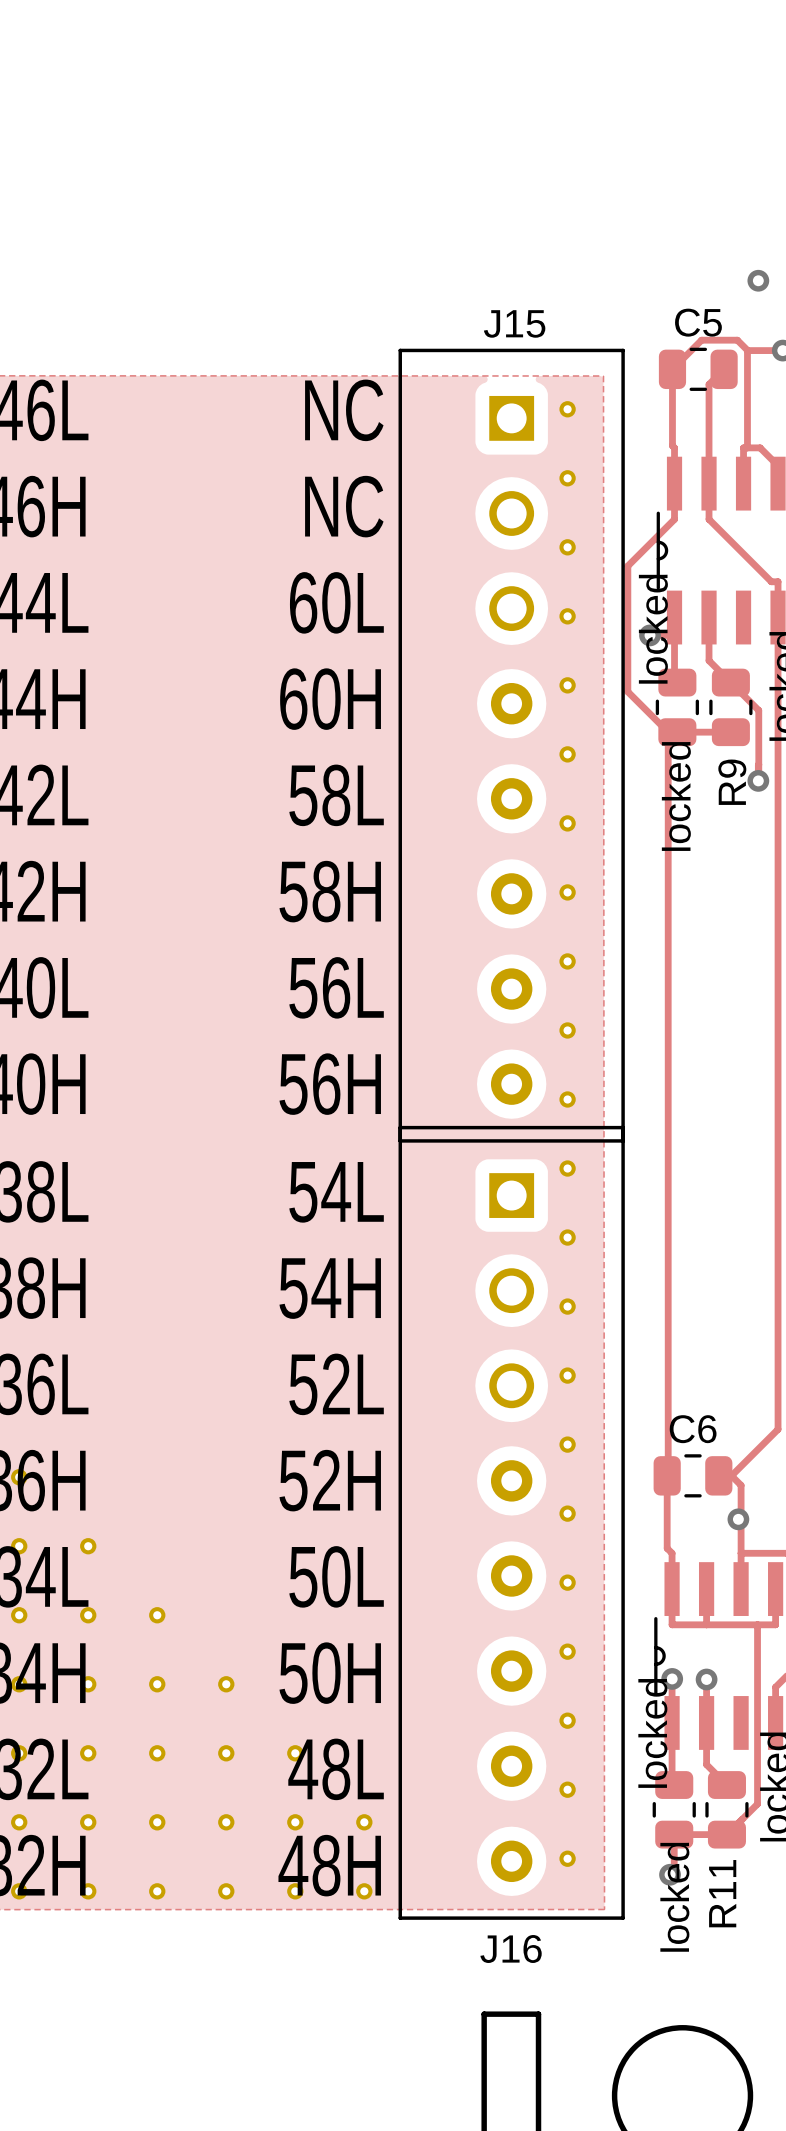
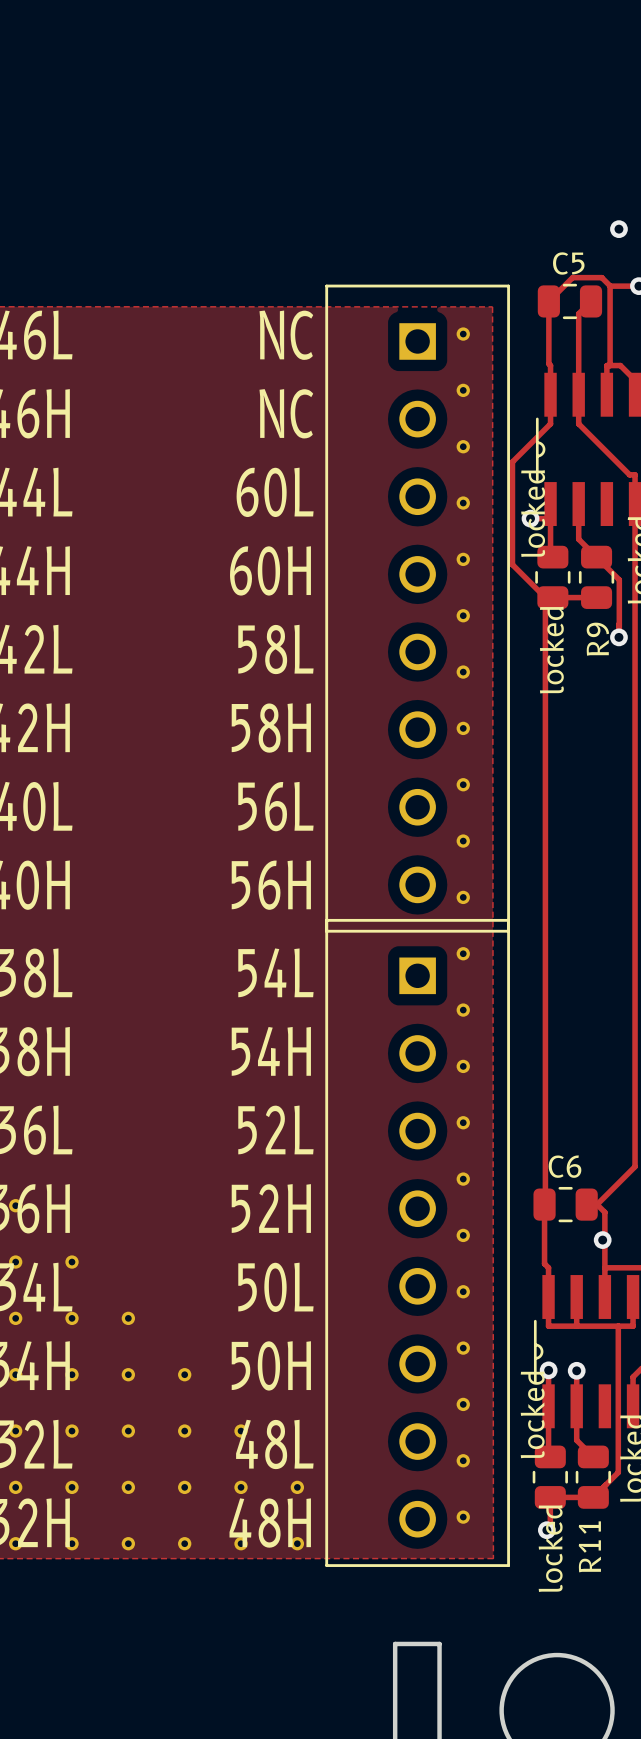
J15: (511, 745) -> none
part: none -> (417, 608)
J16: (511, 1522) -> none
part: none -> (417, 1242)

